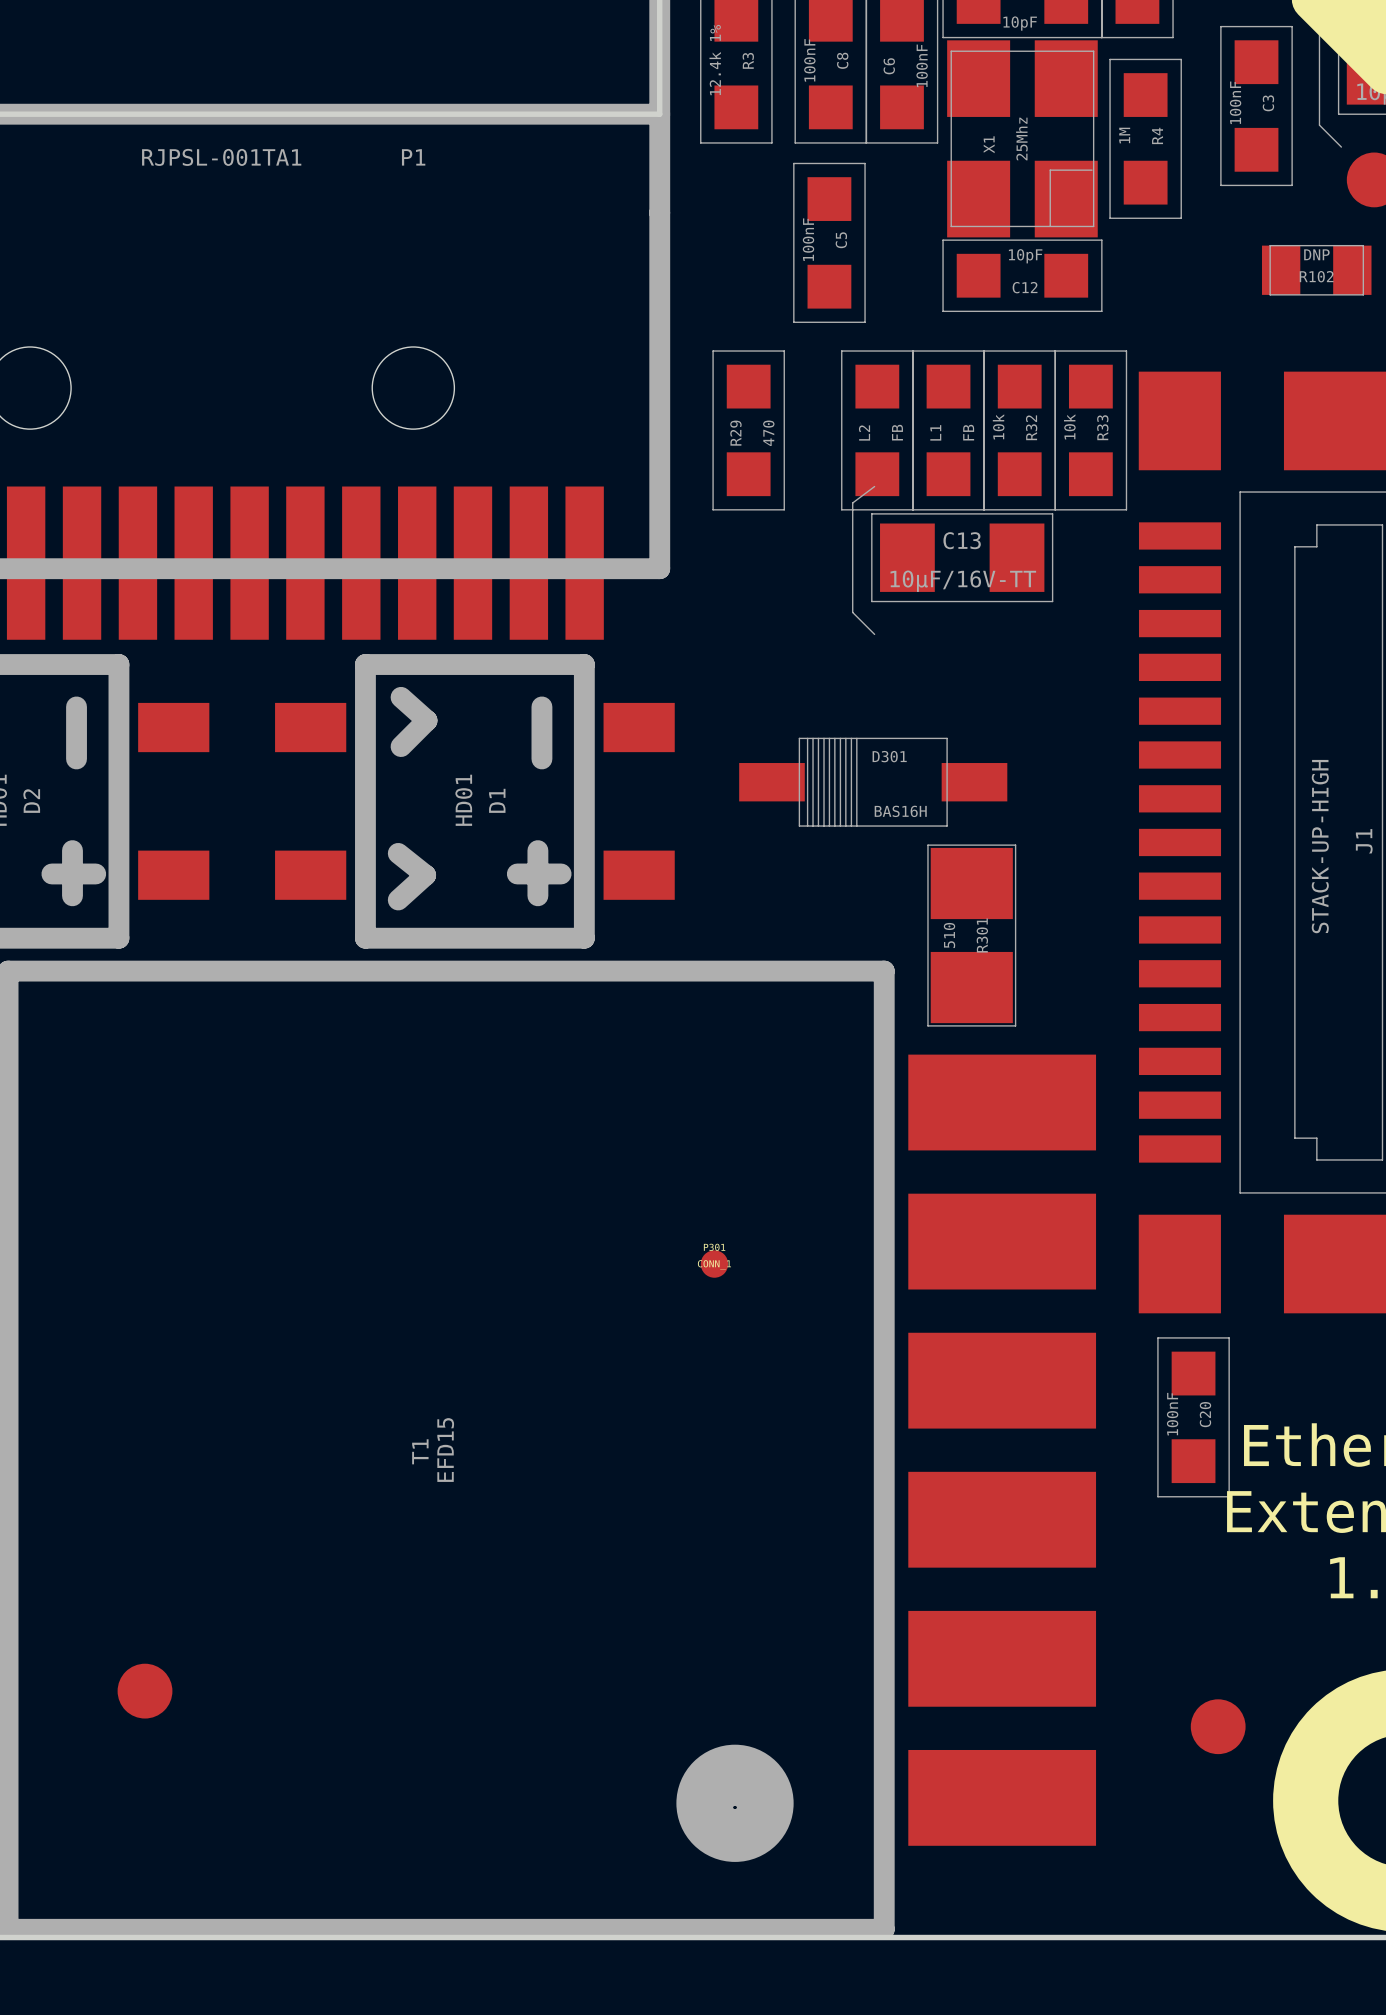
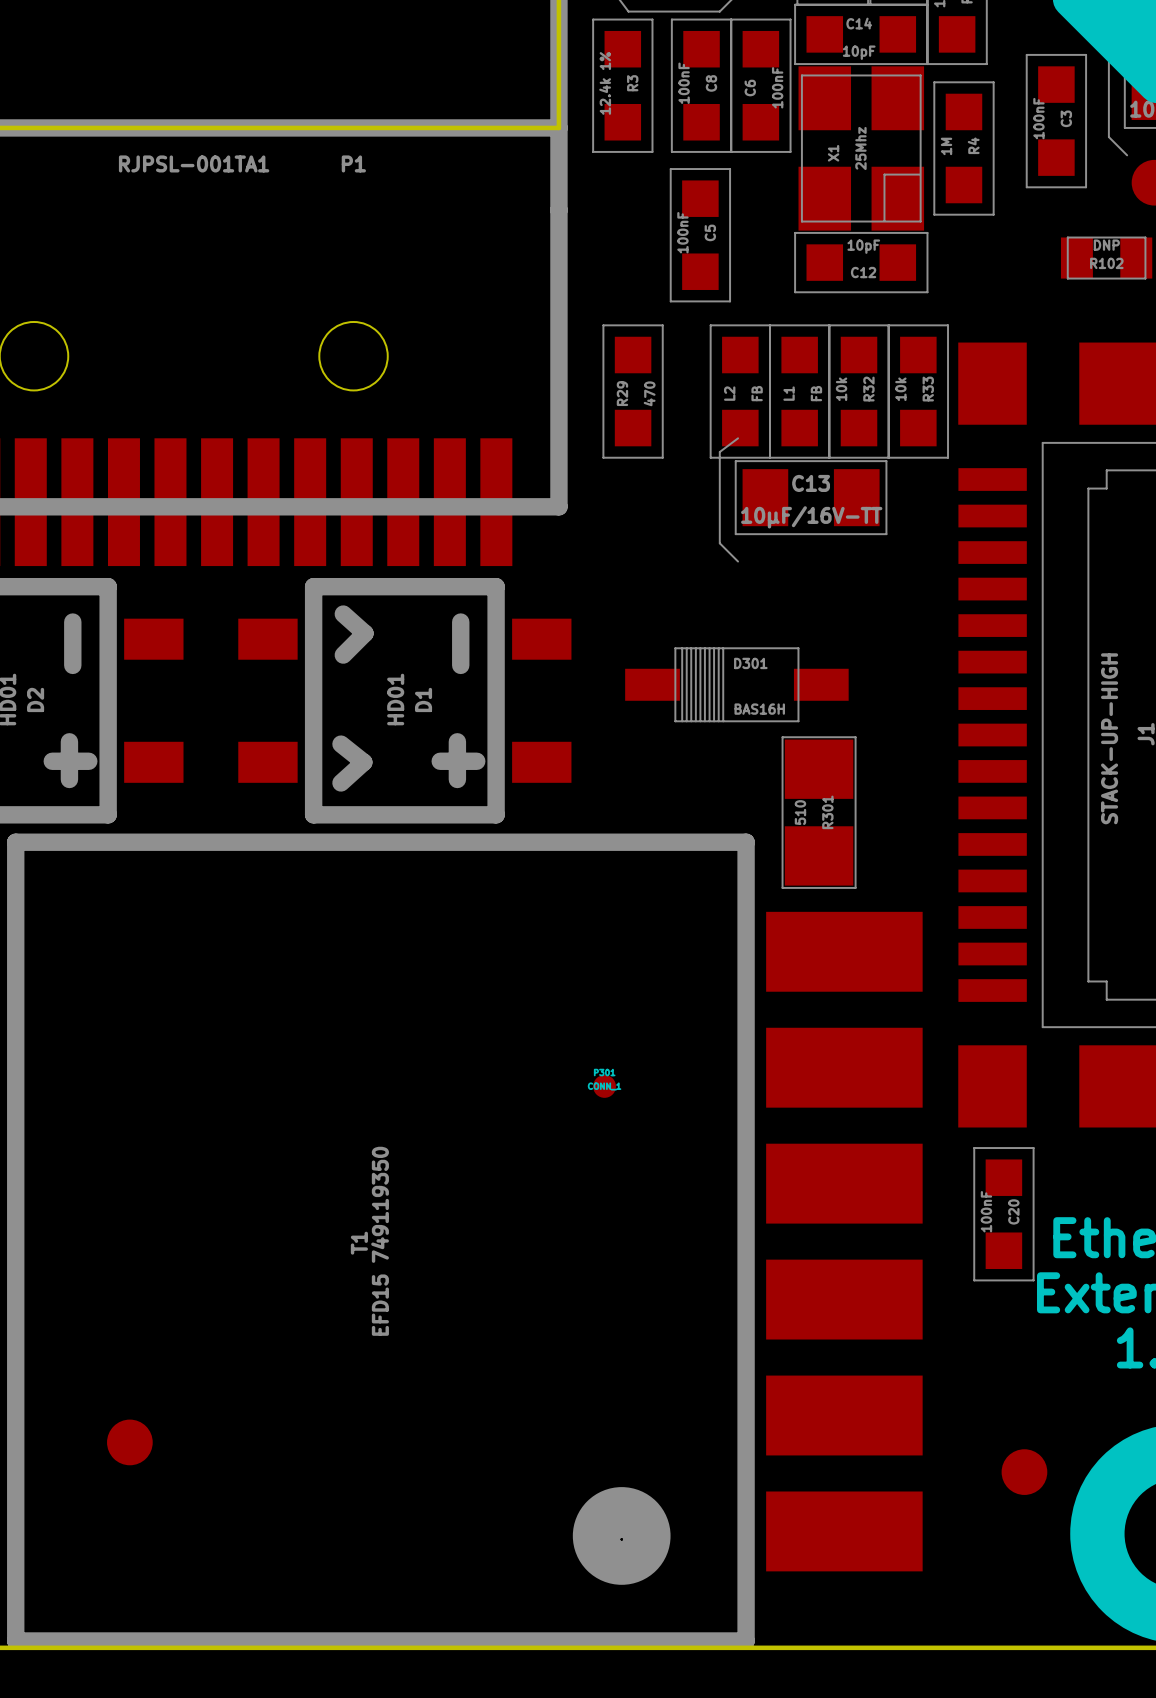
T1 value: EFD15 (445, 1450) -> EFD15 749119350 (380, 1241)

